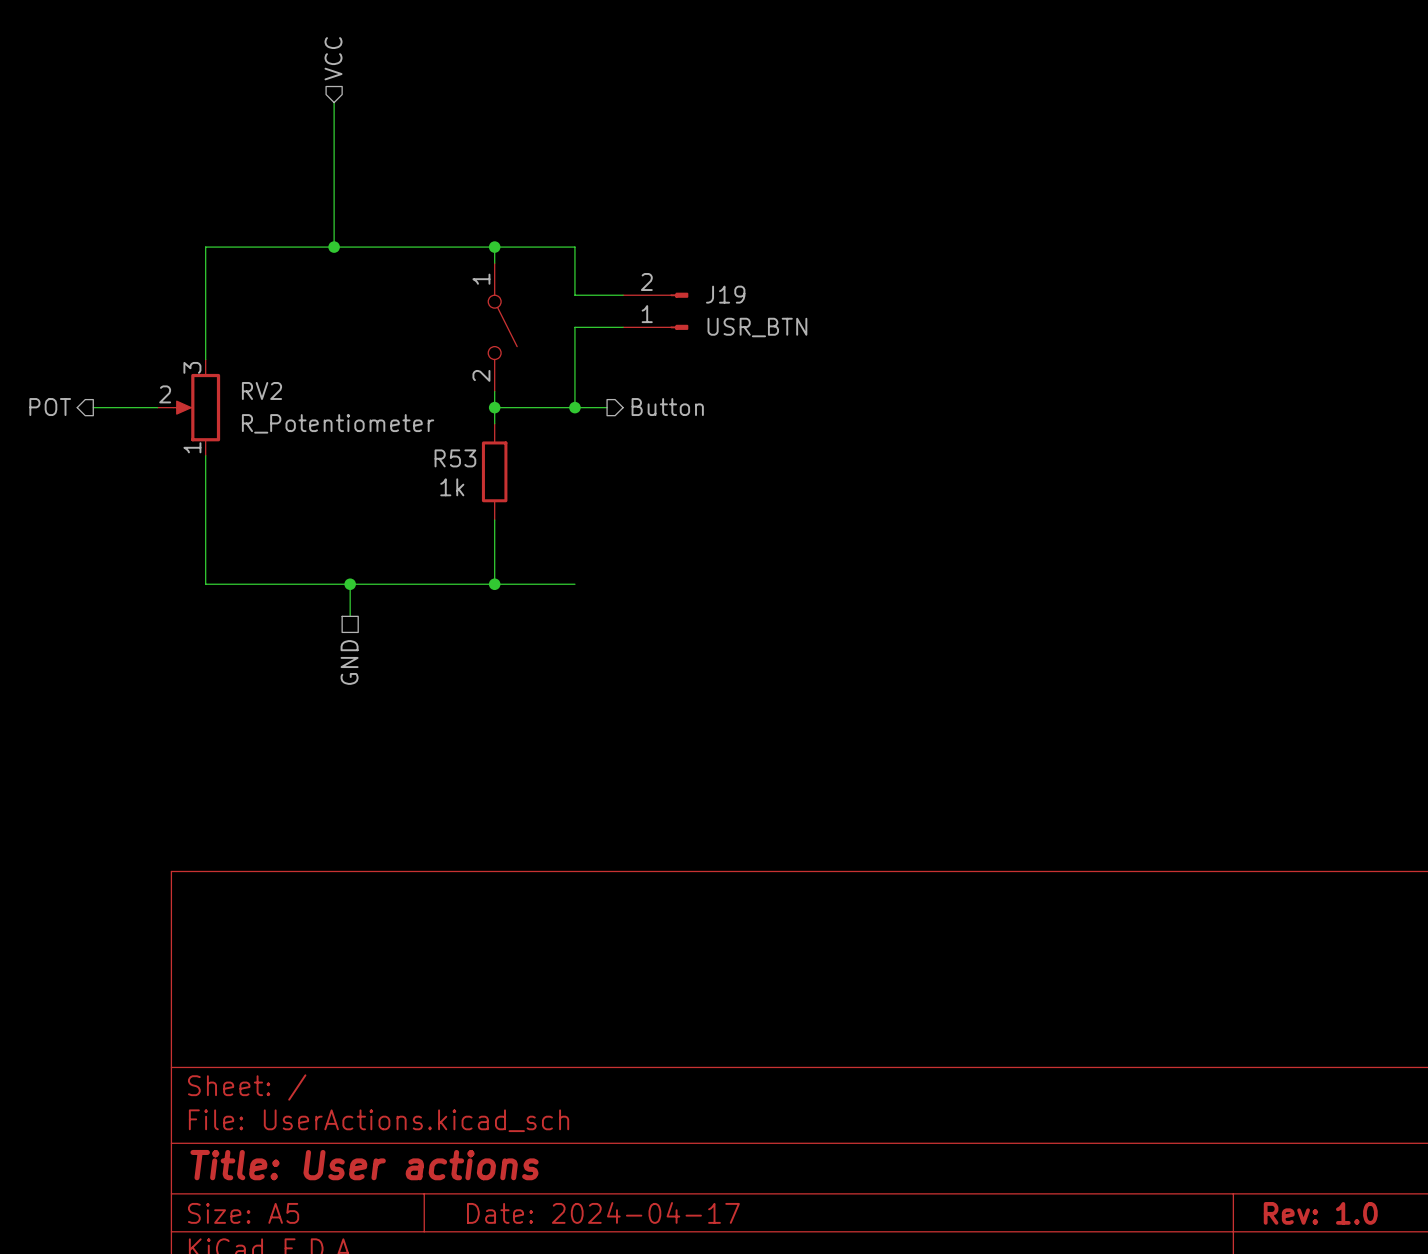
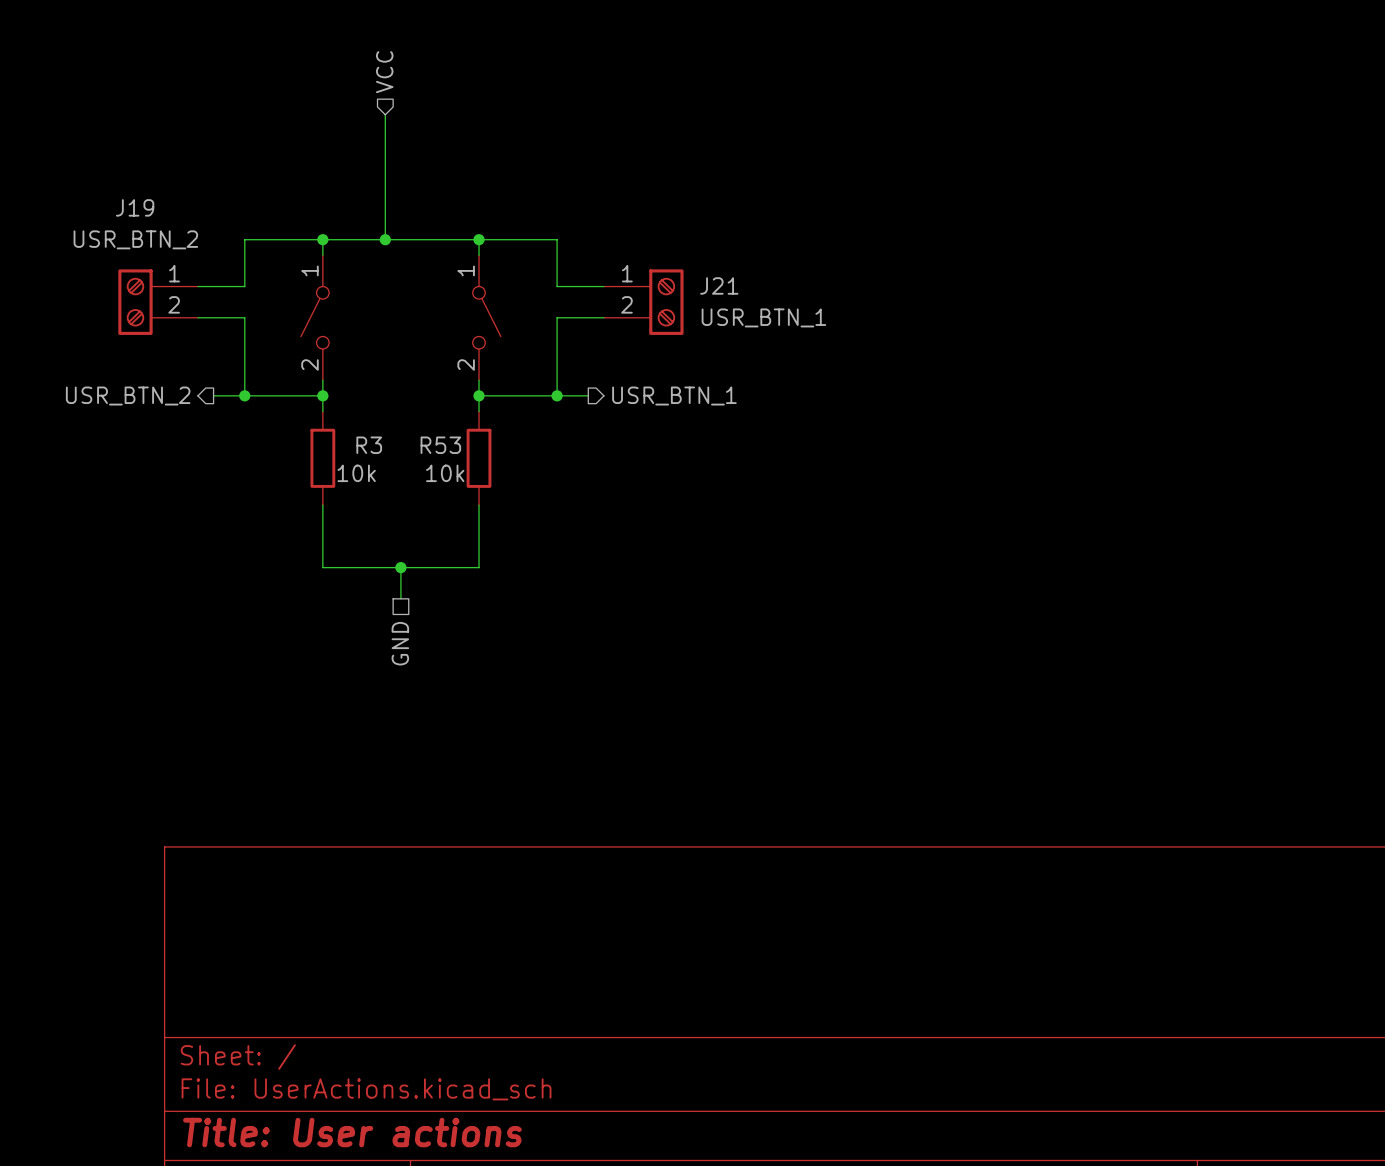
hierarchical label position: VCC (333, 58) -> VCC (384, 72)
wire: (334, 102) (334, 247) -> (322, 255) (322, 239)
wire: none -> (385, 114) (385, 239)
wire: (253, 247) (205, 247) (205, 359) -> (244, 239) (244, 286) (197, 286)
junction: none -> (385, 239)
J19 symbol: [623, 292, 689, 330] -> [118, 269, 198, 335]
J19 name position: J19 (725, 294) -> J19 (135, 207)
J21: none -> USR_BTN_1 (643, 302)
wire: none -> (197, 317) (244, 317) (244, 395)
part: none -> (315, 317)
J19 value: USR_BTN (757, 327) -> USR_BTN_2 (135, 239)
wire: none -> (322, 380) (322, 411)
hierarchical label: POT (50, 407) -> none
wire: (93, 407) (157, 407) -> none
hierarchical label: none -> USR_BTN_2 (128, 396)
RV2: R_Potentiometer (188, 407) -> none
wire: none -> (213, 395) (322, 395)
junction: none -> (244, 395)
junction: none -> (322, 395)
hierarchical label: Button (667, 407) -> USR_BTN_1 (674, 396)
wire: (205, 455) (205, 584) (334, 584) -> (322, 505) (322, 567)
R3: none -> 10k (322, 458)
R53 value: 1k (452, 487) -> 10k (445, 473)
wire: (350, 584) (350, 616) -> (400, 567) (400, 598)
junction: (350, 584) -> none
junction: none -> (400, 567)
wire: (494, 584) (574, 584) -> none
junction: (494, 584) -> none
hierarchical label position: GND (349, 662) -> GND (400, 643)

